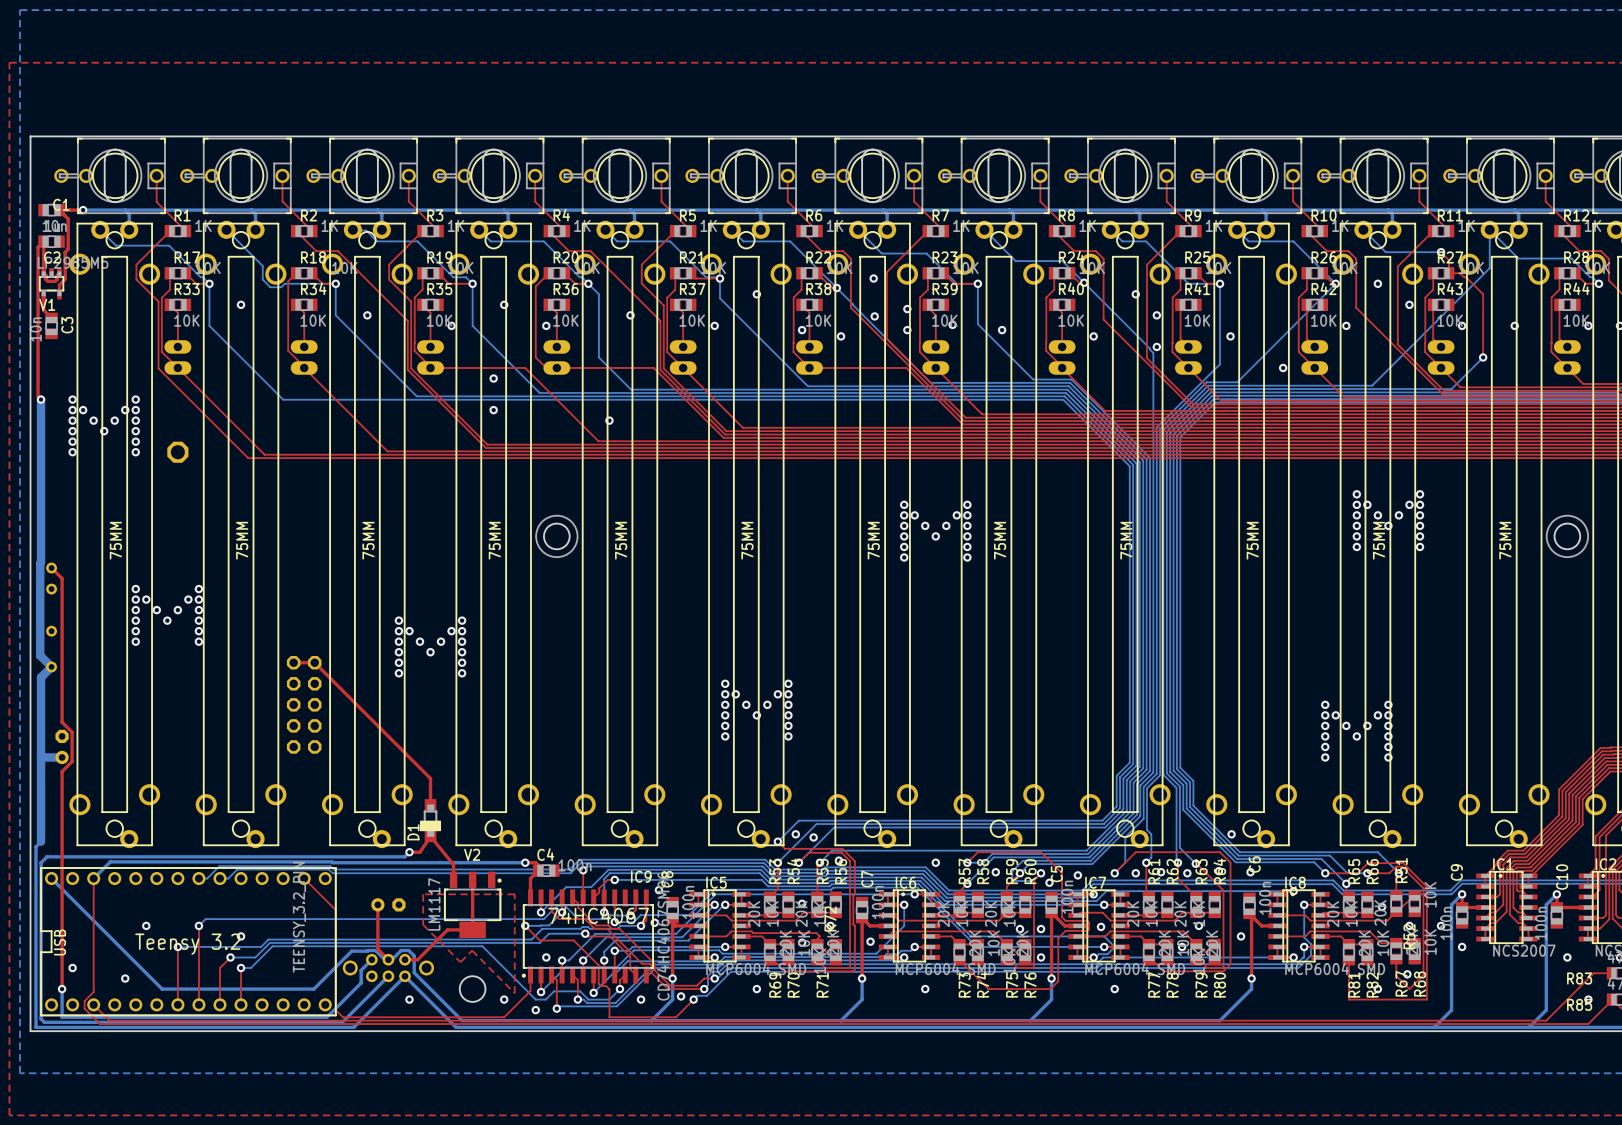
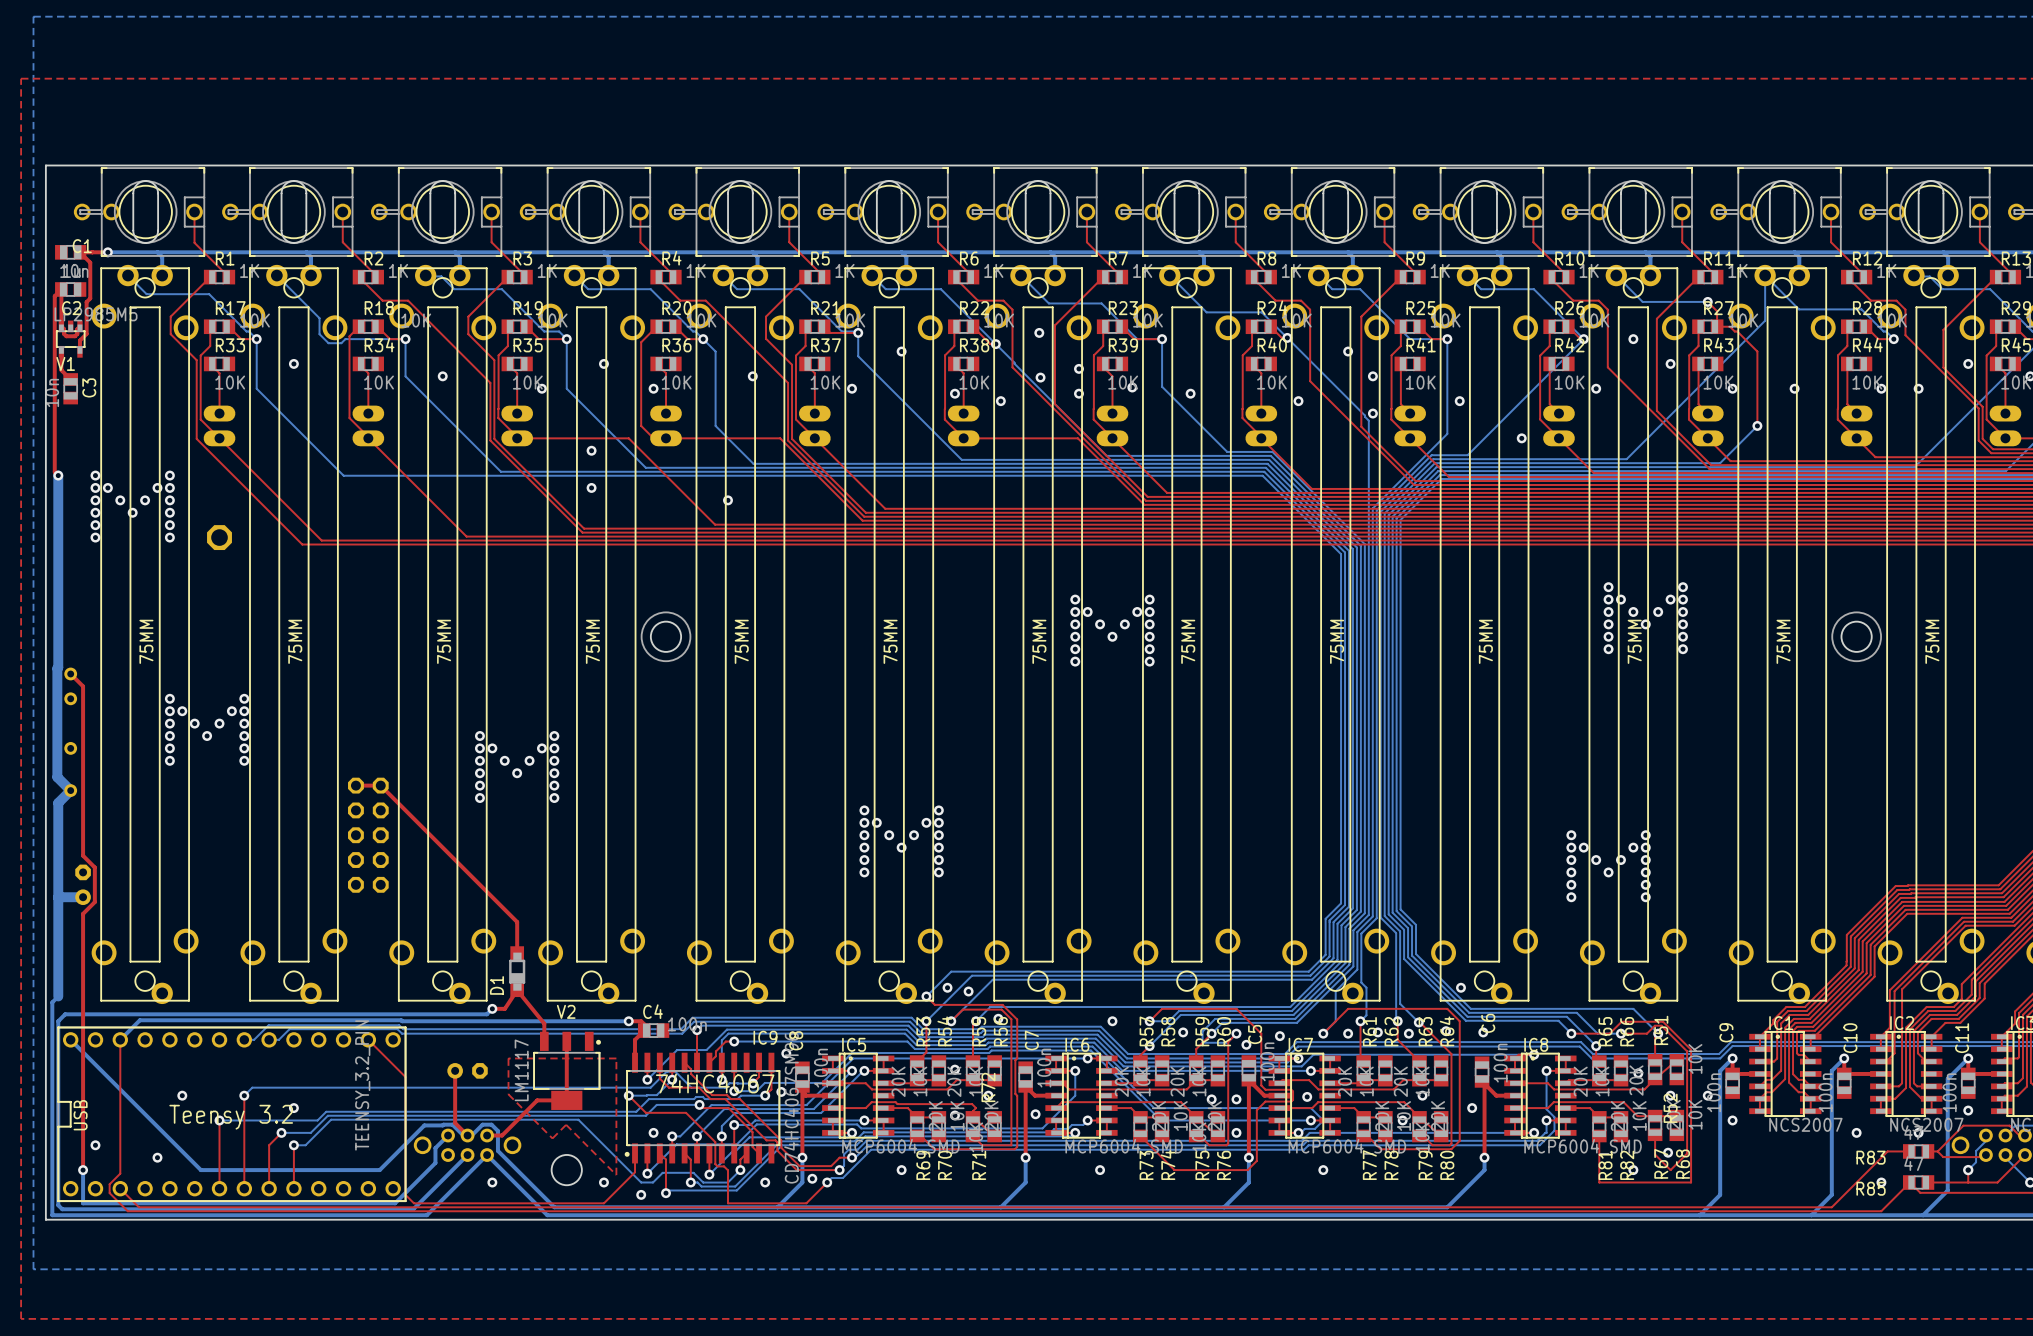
drawing: [419, 820, 442, 832] -> none

